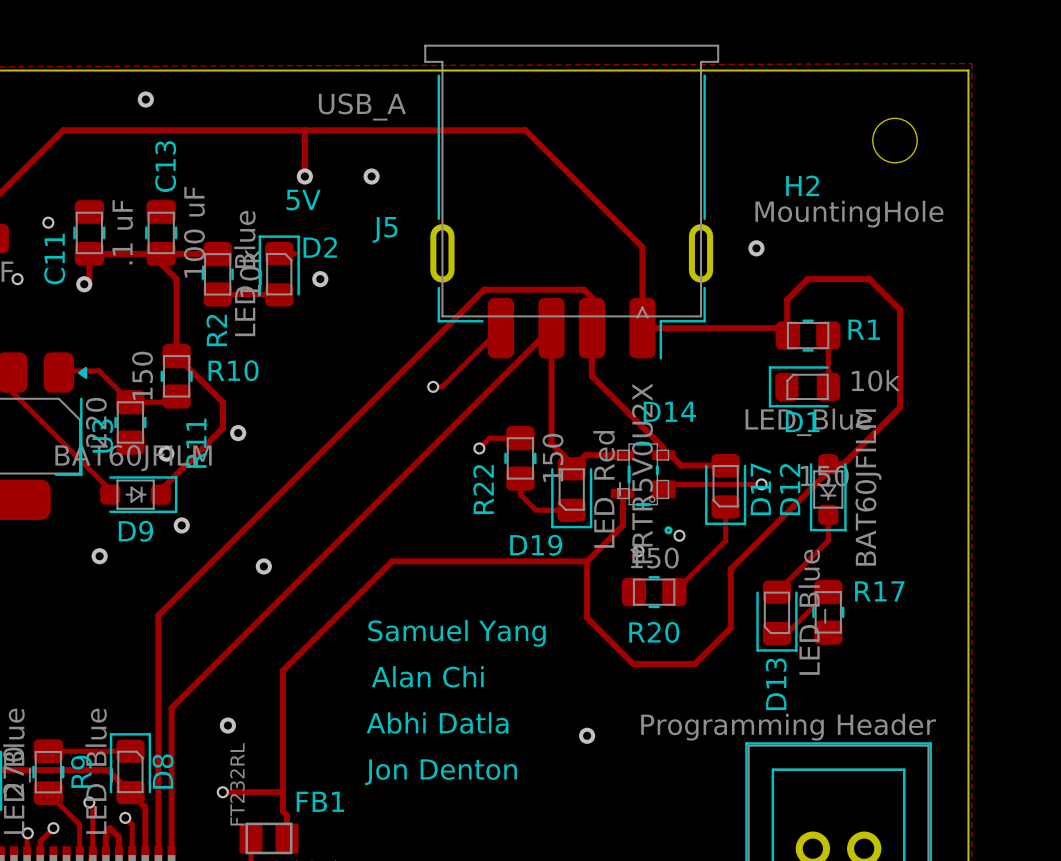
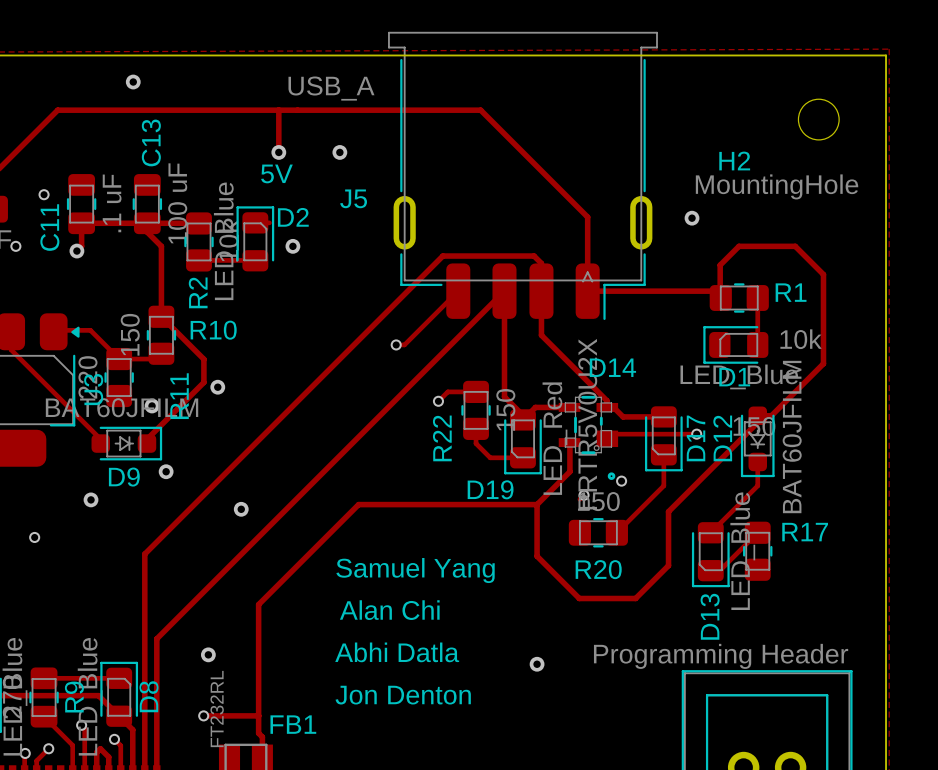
via: none -> (34, 537)

